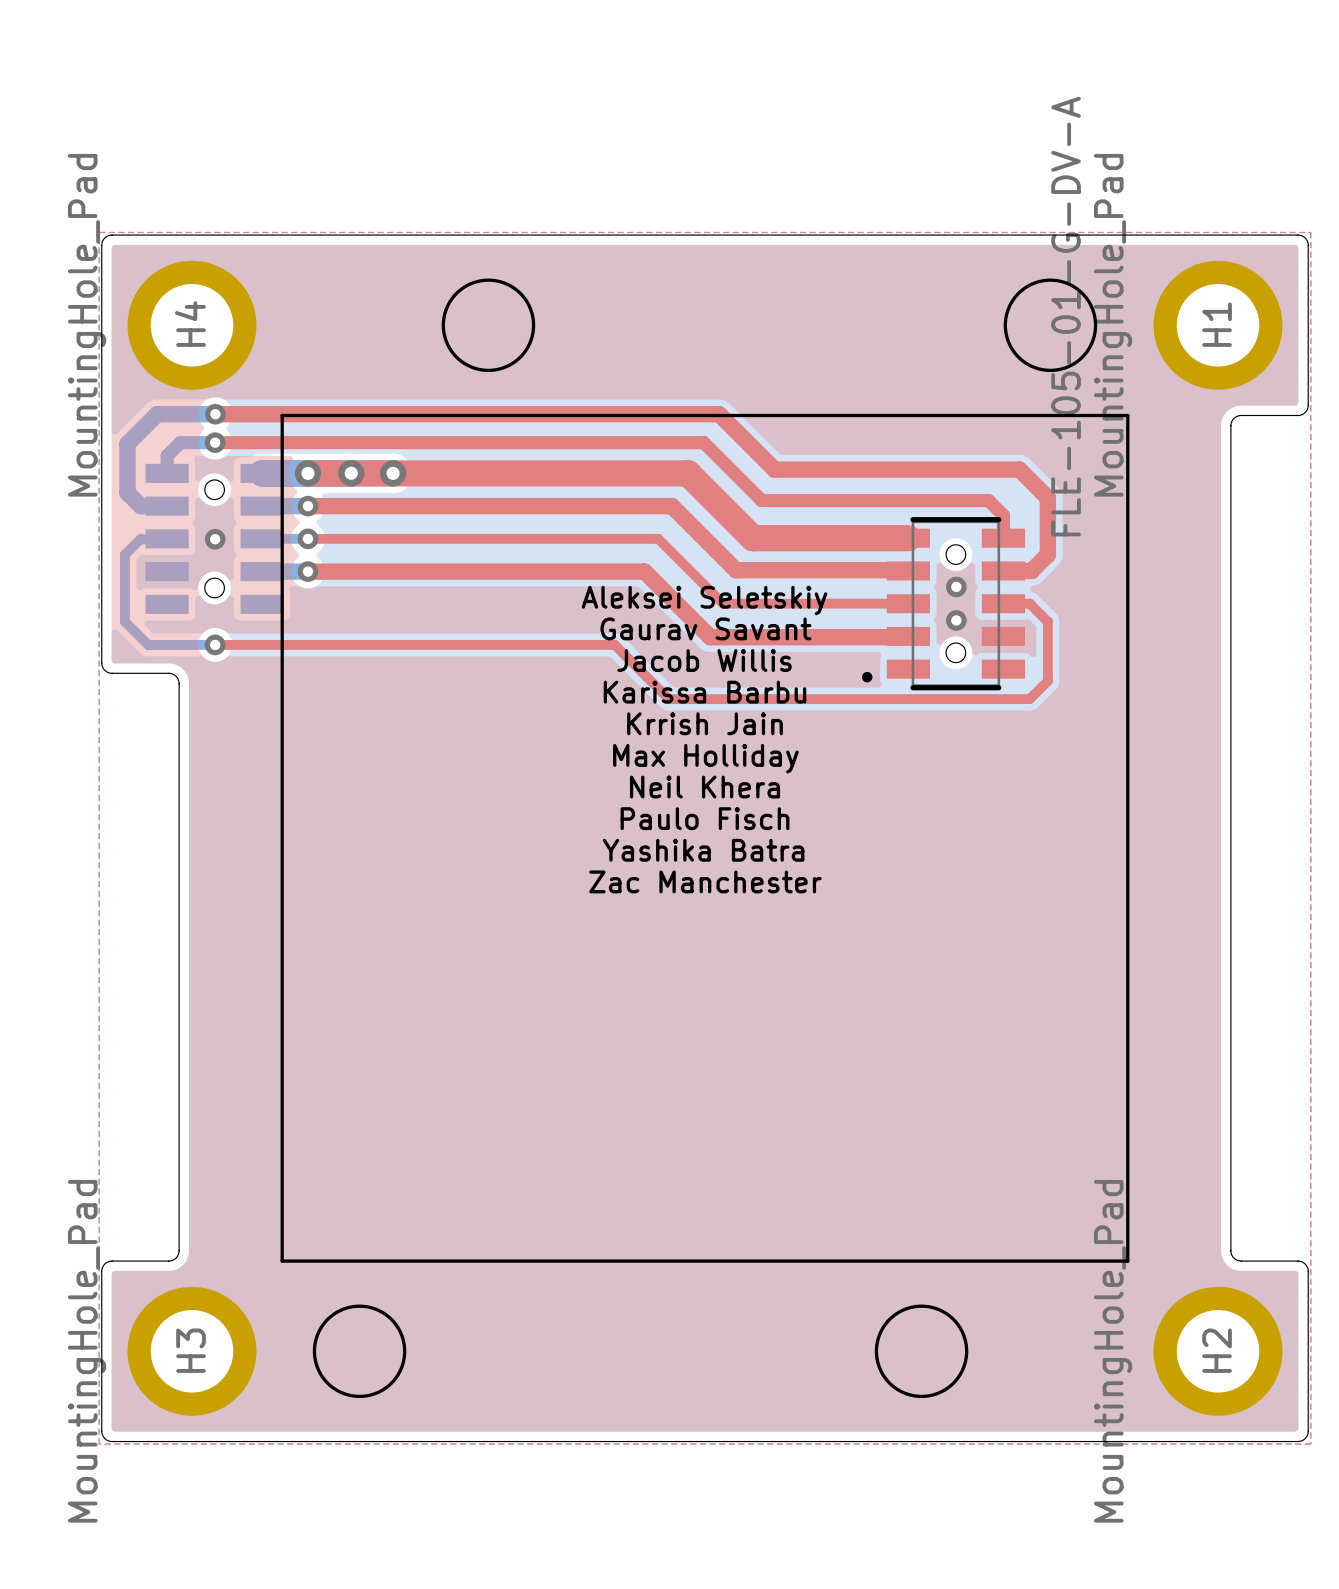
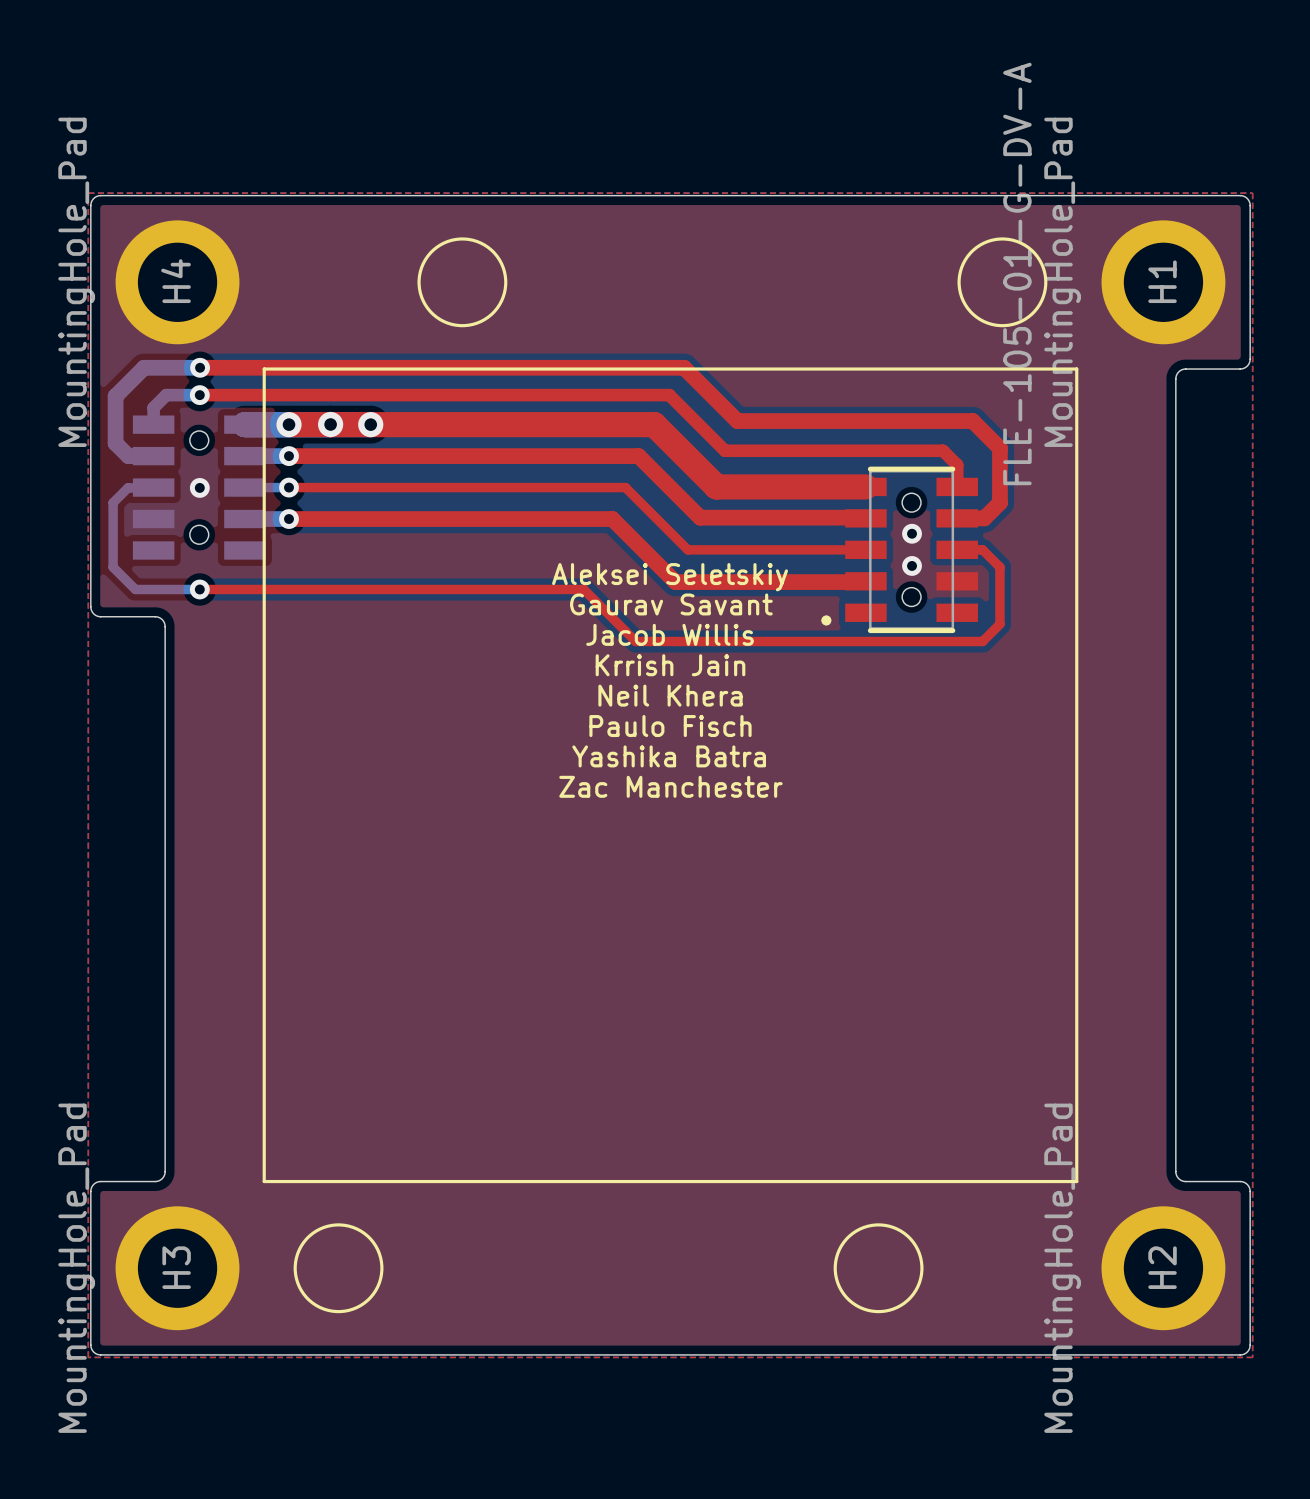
text: Aleksei Seletskiy (704, 600) -> none
text: Gaurav Savant (705, 628) -> Aleksei Seletskiy (670, 577)
text: Jacob Willis (704, 660) -> Gaurav Savant (671, 604)
text: Karissa Barbu (704, 692) -> Jacob Willis (670, 634)
text: Max Holliday (705, 758) -> Neil Khera (670, 695)
text: Neil Khera (704, 787) -> Paulo Fisch (670, 726)
text: Paulo Fisch (704, 818) -> Yashika Batra (669, 756)
text: Yashika Batra (703, 850) -> Zac Manchester (670, 786)
text: Zac Manchester (705, 881) -> none

